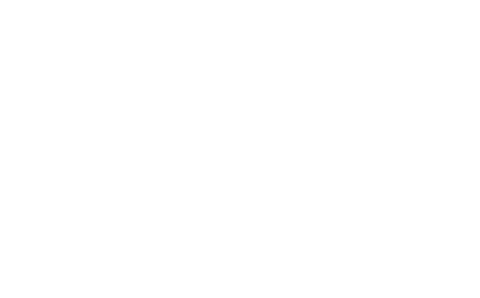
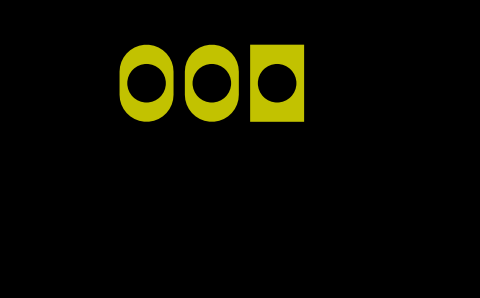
part: none -> (211, 83)

